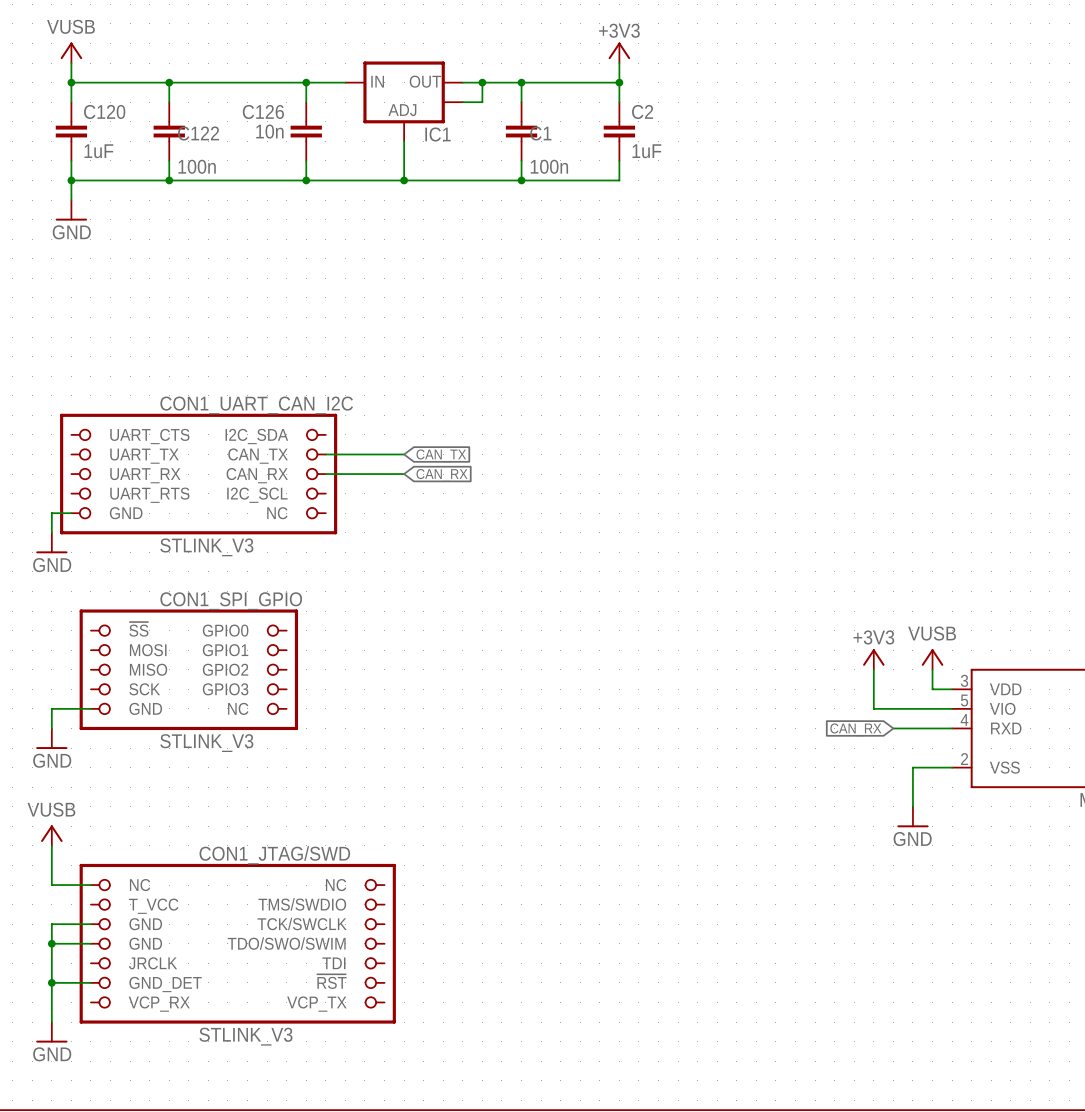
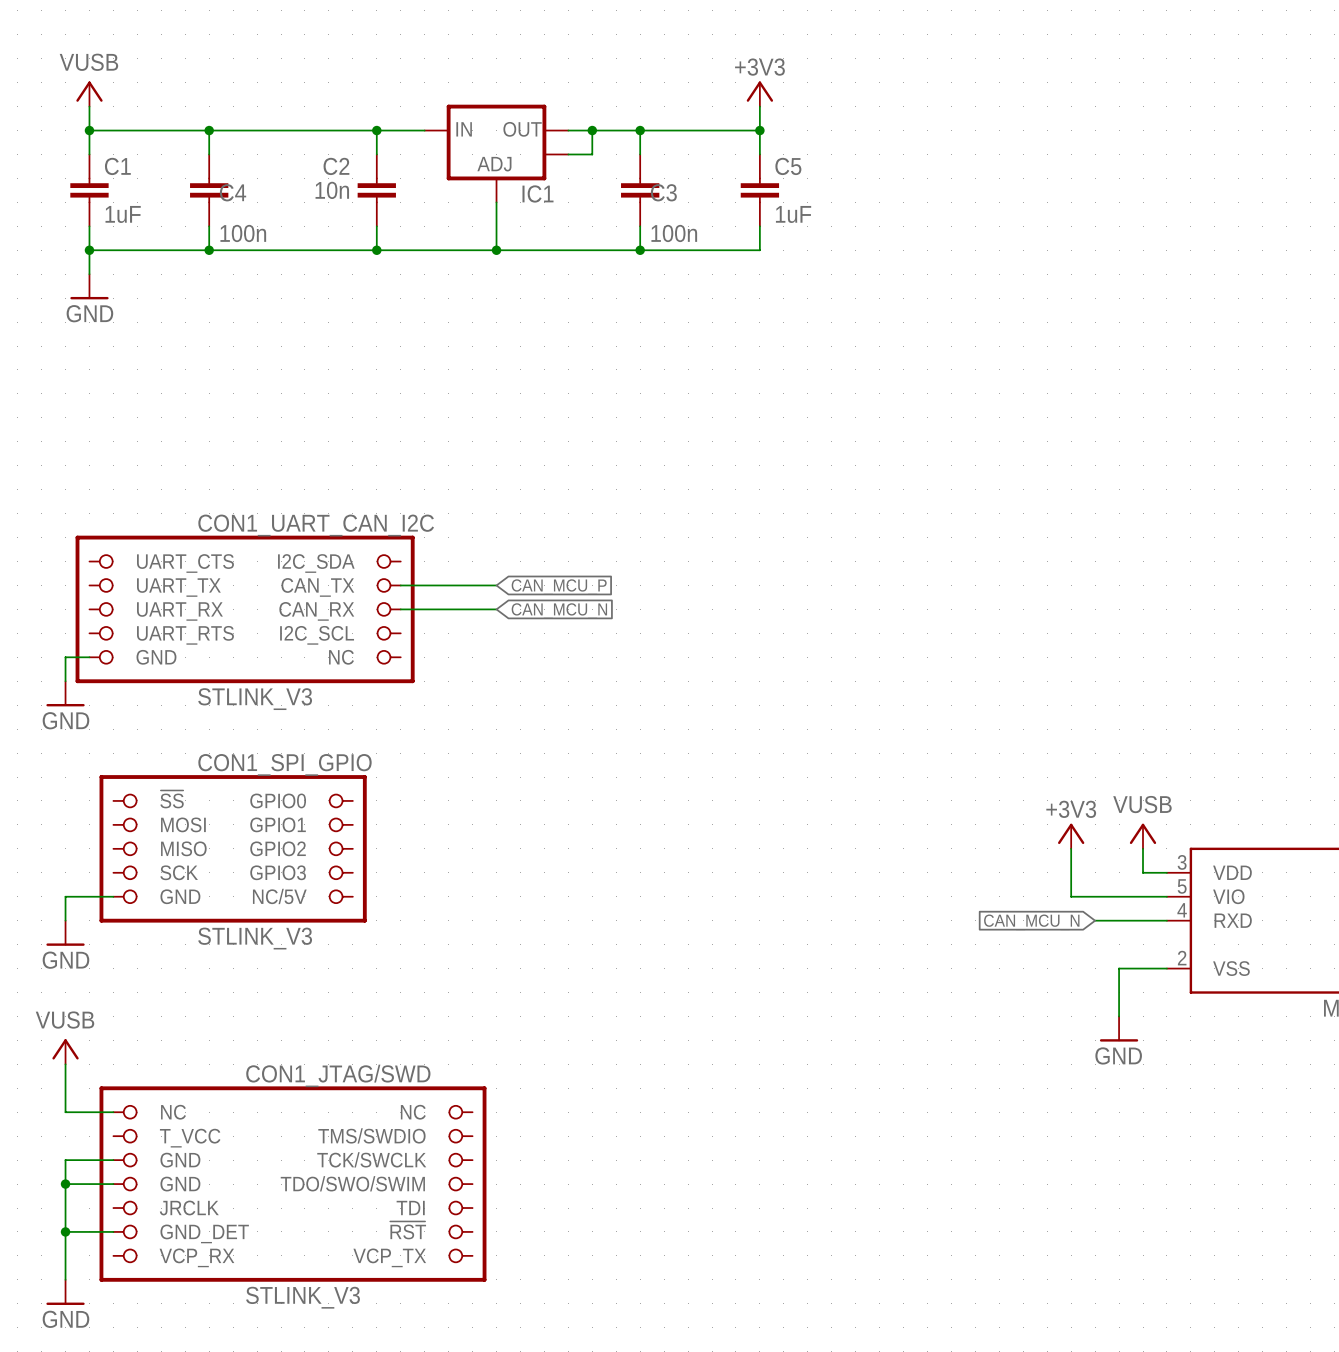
C120 name: C120 (104, 111) -> C1 (117, 166)
C126 name: C126 (263, 111) -> C2 (336, 166)
C2 name: C2 (642, 111) -> C5 (788, 166)
C122 name: C122 (198, 133) -> C4 (233, 192)
C1 name: C1 (540, 133) -> C3 (663, 192)
global label: CAN_TX (441, 455) -> CAN_MCU_P (559, 587)
global label: CAN_RX (442, 475) -> CAN_MCU_N (559, 611)
CON1_SPI_GPIO pin name: NC (238, 708) -> NC/5V (279, 896)
global label: CAN_RX (855, 729) -> CAN_MCU_N (1031, 922)

